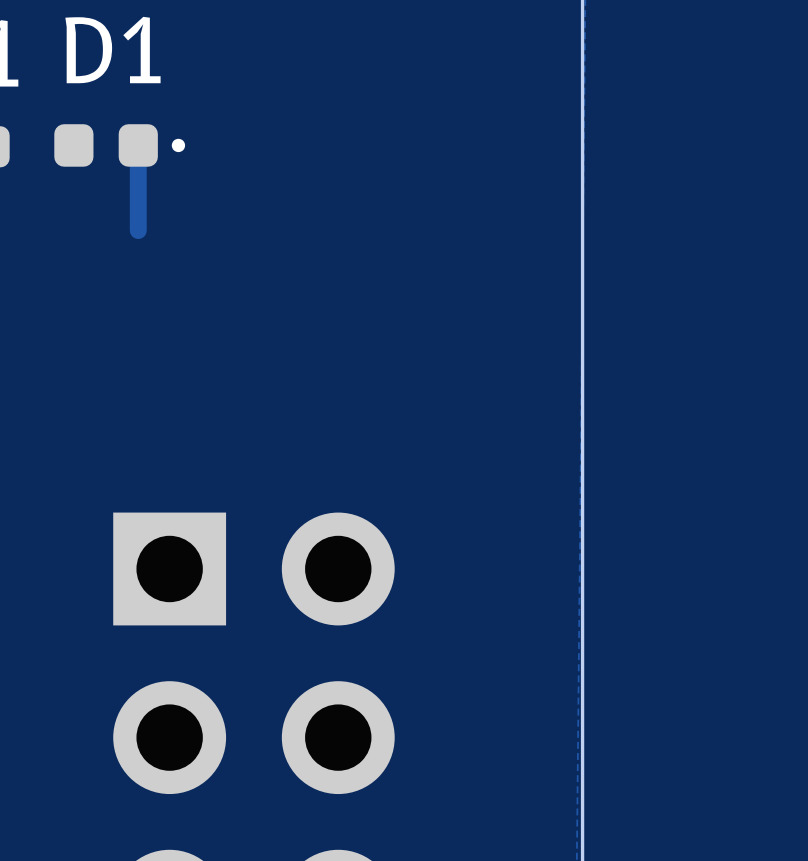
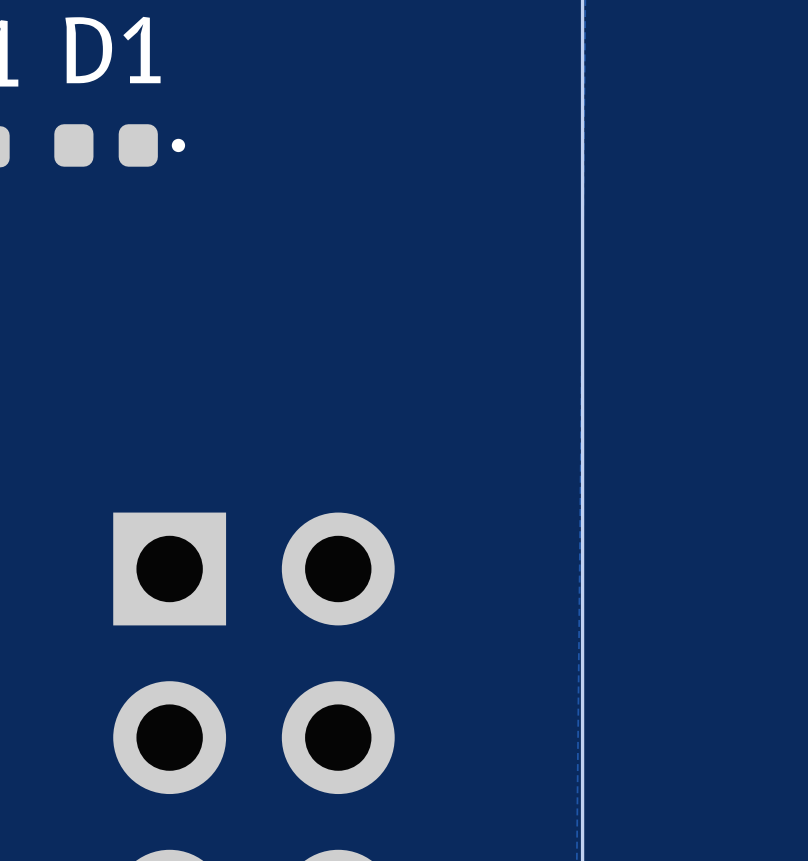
track: (138, 145) (138, 230) -> none

